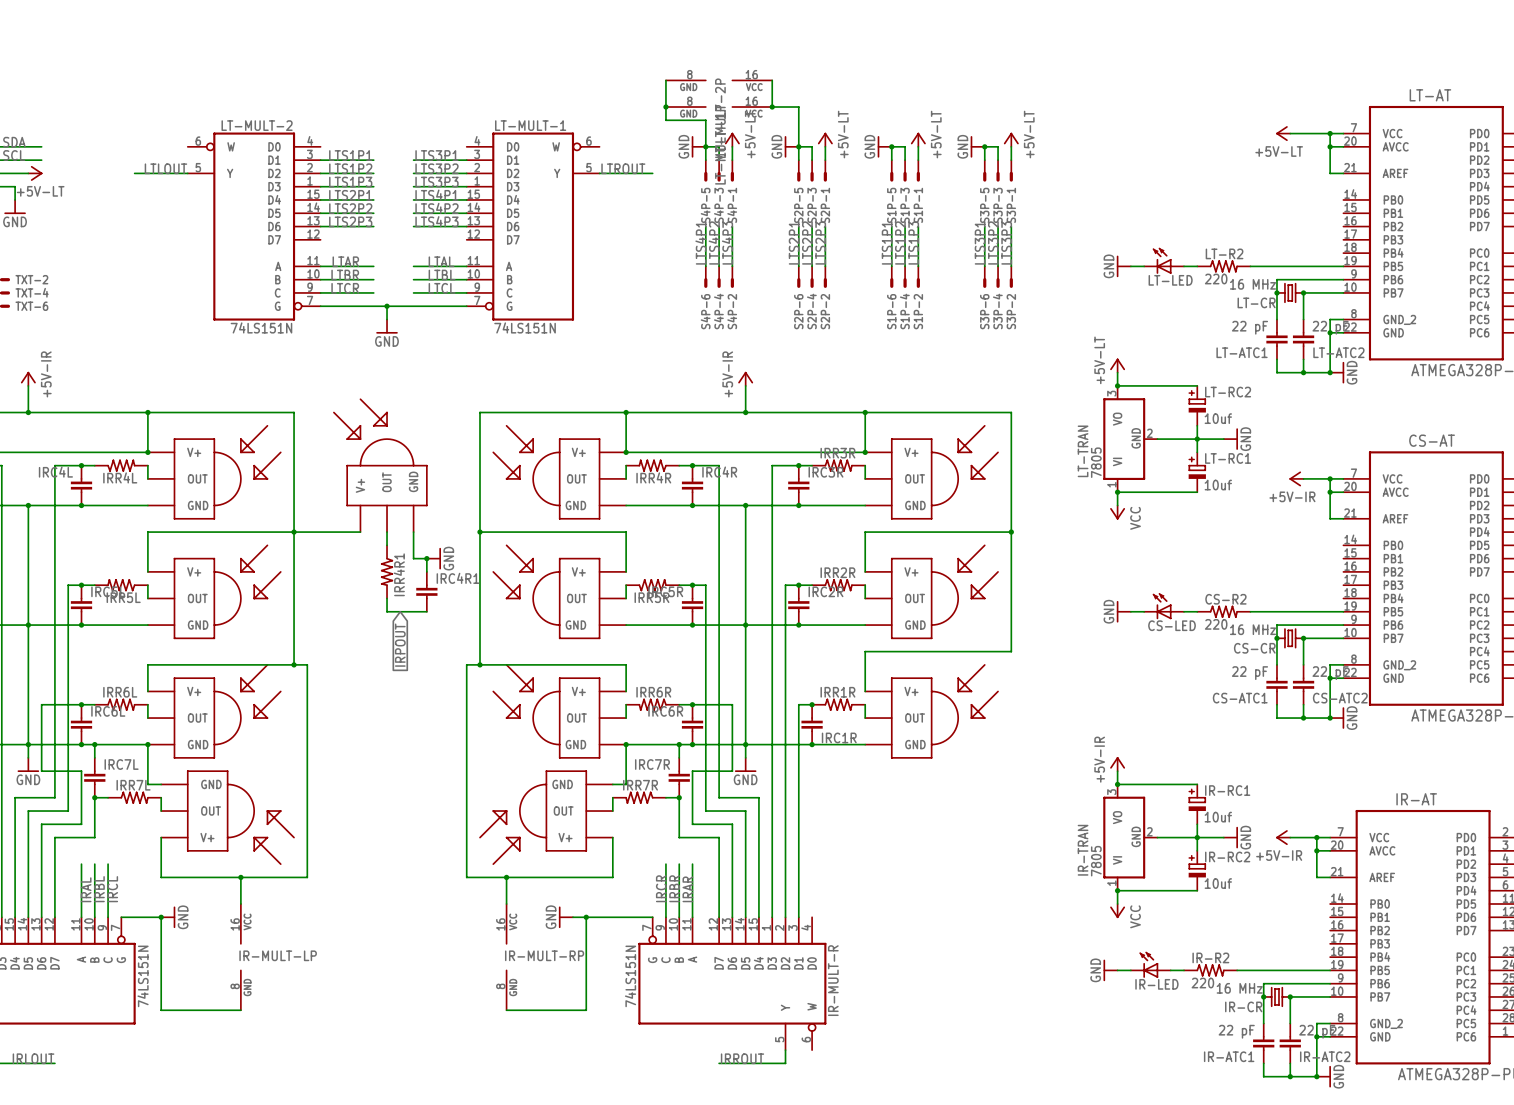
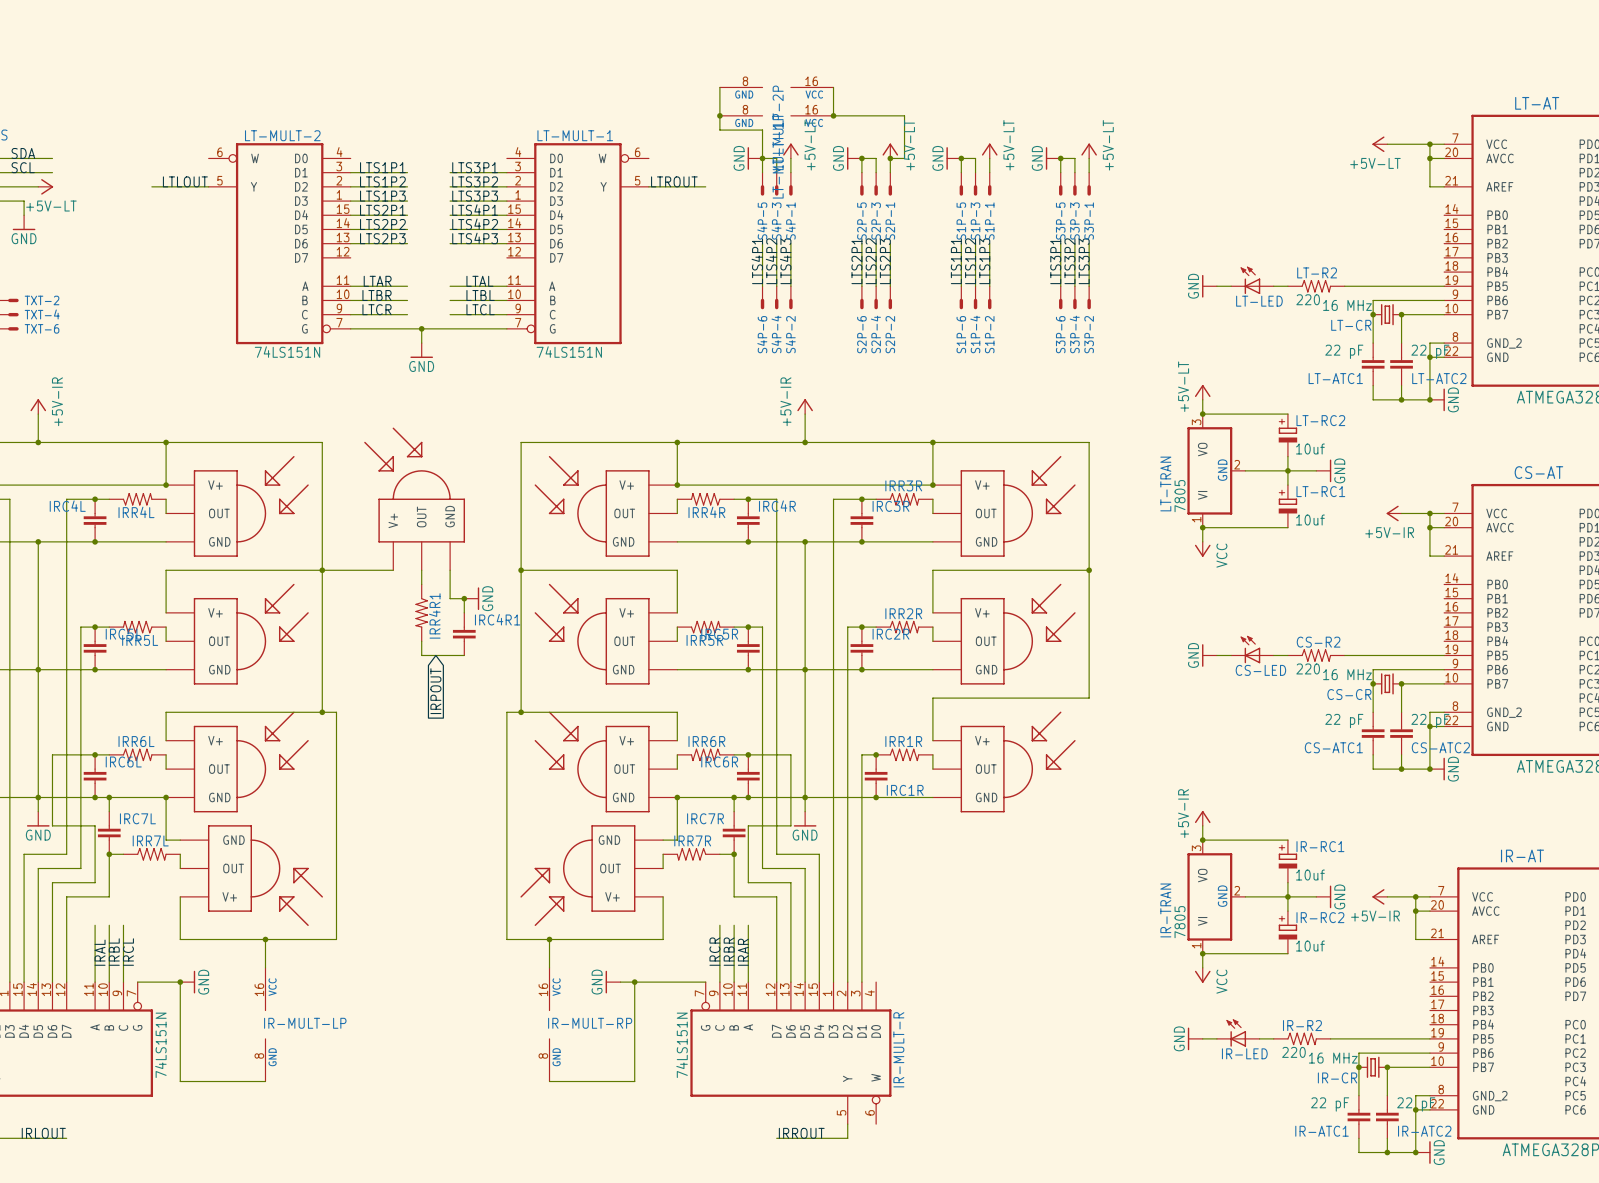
wire: (798, 107) (798, 146) -> (861, 115) (904, 115) (904, 158) (890, 158)
junction: none -> (890, 158)

